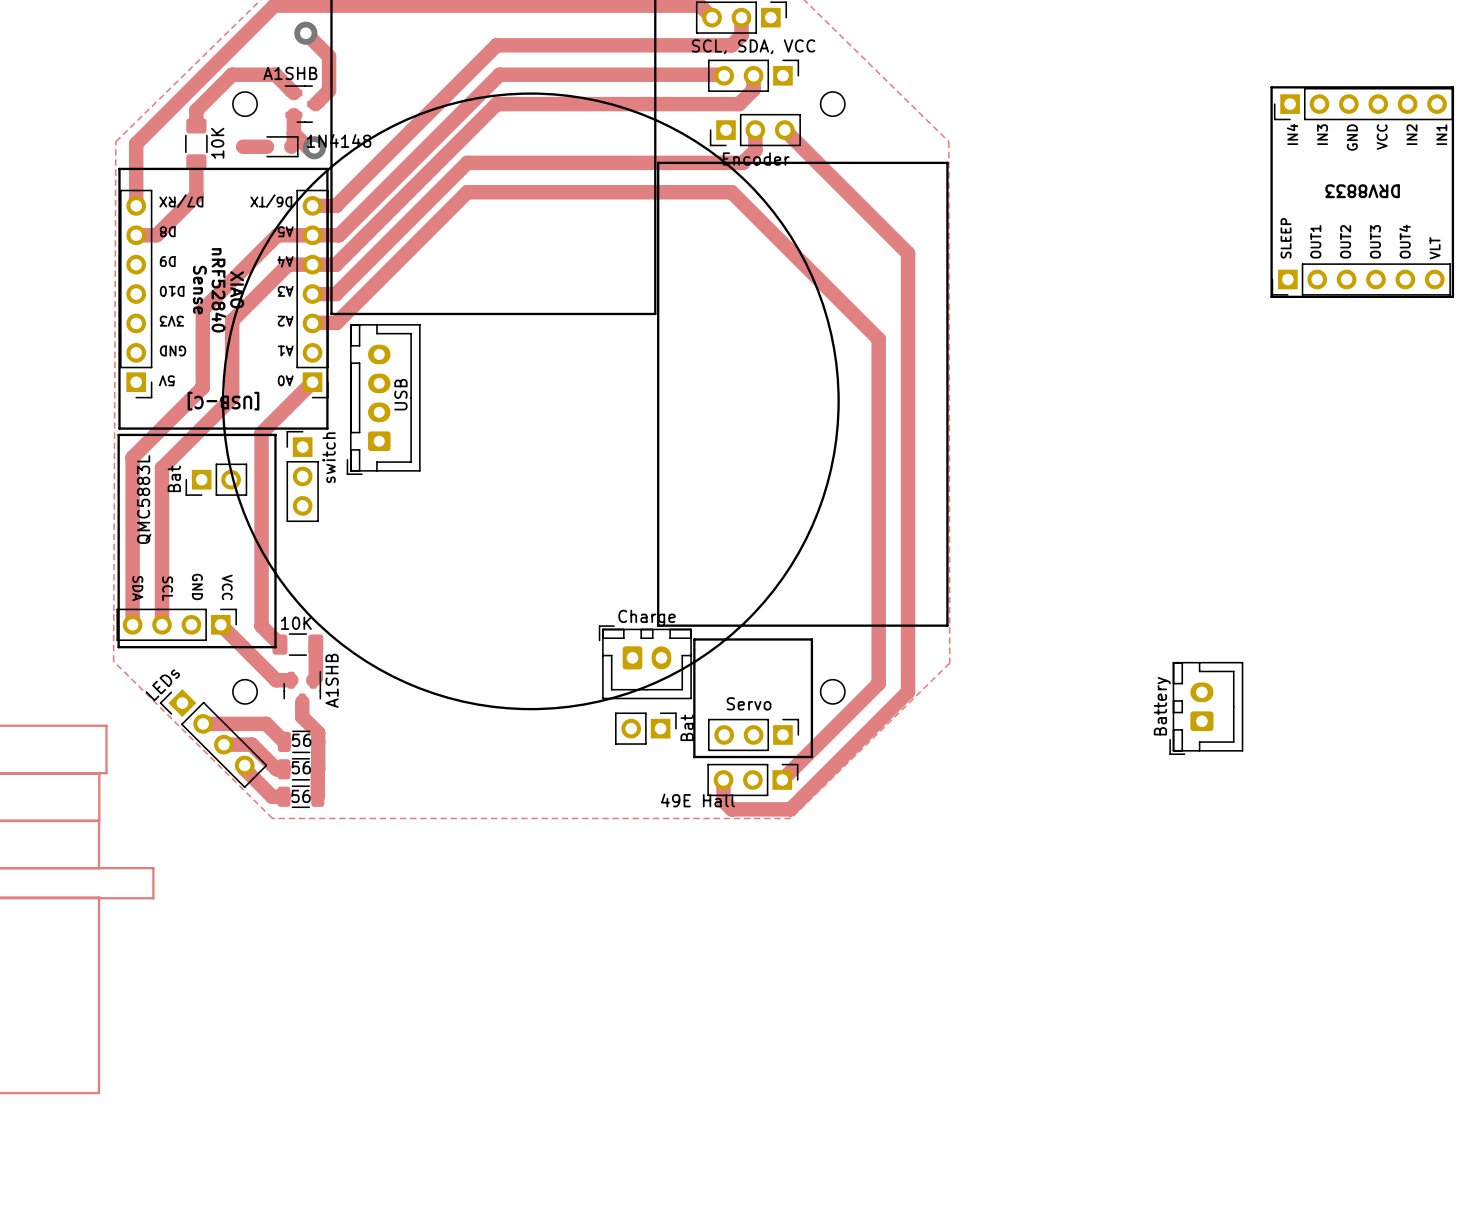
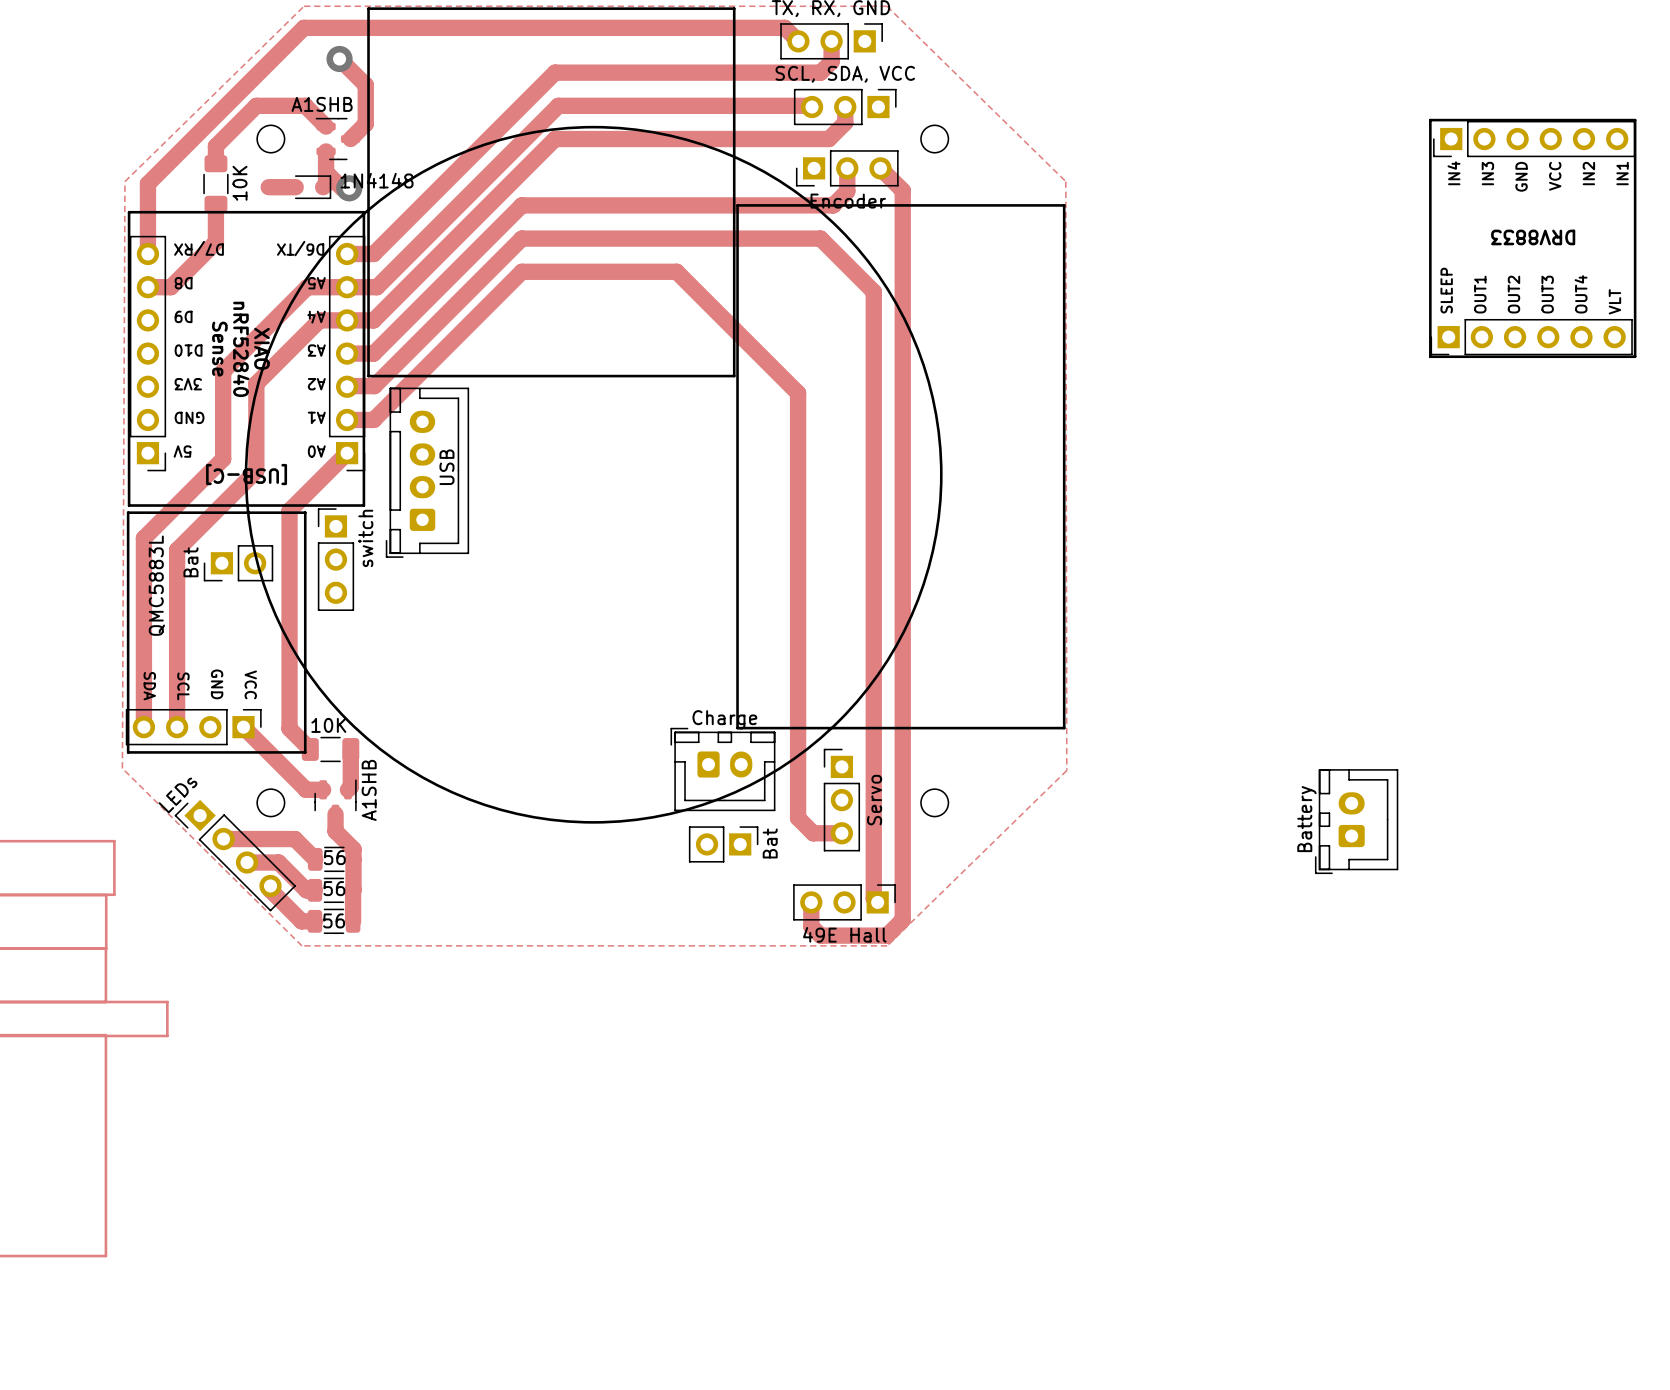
track: (804, 149) (908, 253) (908, 691) (804, 795) -> (902, 190) (902, 919)
track: (778, 239) (878, 339) (878, 683) (782, 779) -> (873, 291) (873, 898) (877, 902)
track: none -> (347, 419) (373, 419) (521, 271) (676, 271) (798, 393) (798, 818) (813, 833) (841, 833)
line: (694, 639) (811, 639) (811, 757) (694, 757) (694, 639) -> none
Servo name position: Servo (749, 703) -> Servo (874, 800)
Servo rotation: 0° (753, 734) -> 90° counterclockwise (841, 800)
49E Hall name position: 49E Hall (697, 800) -> 49E Hall (844, 934)

